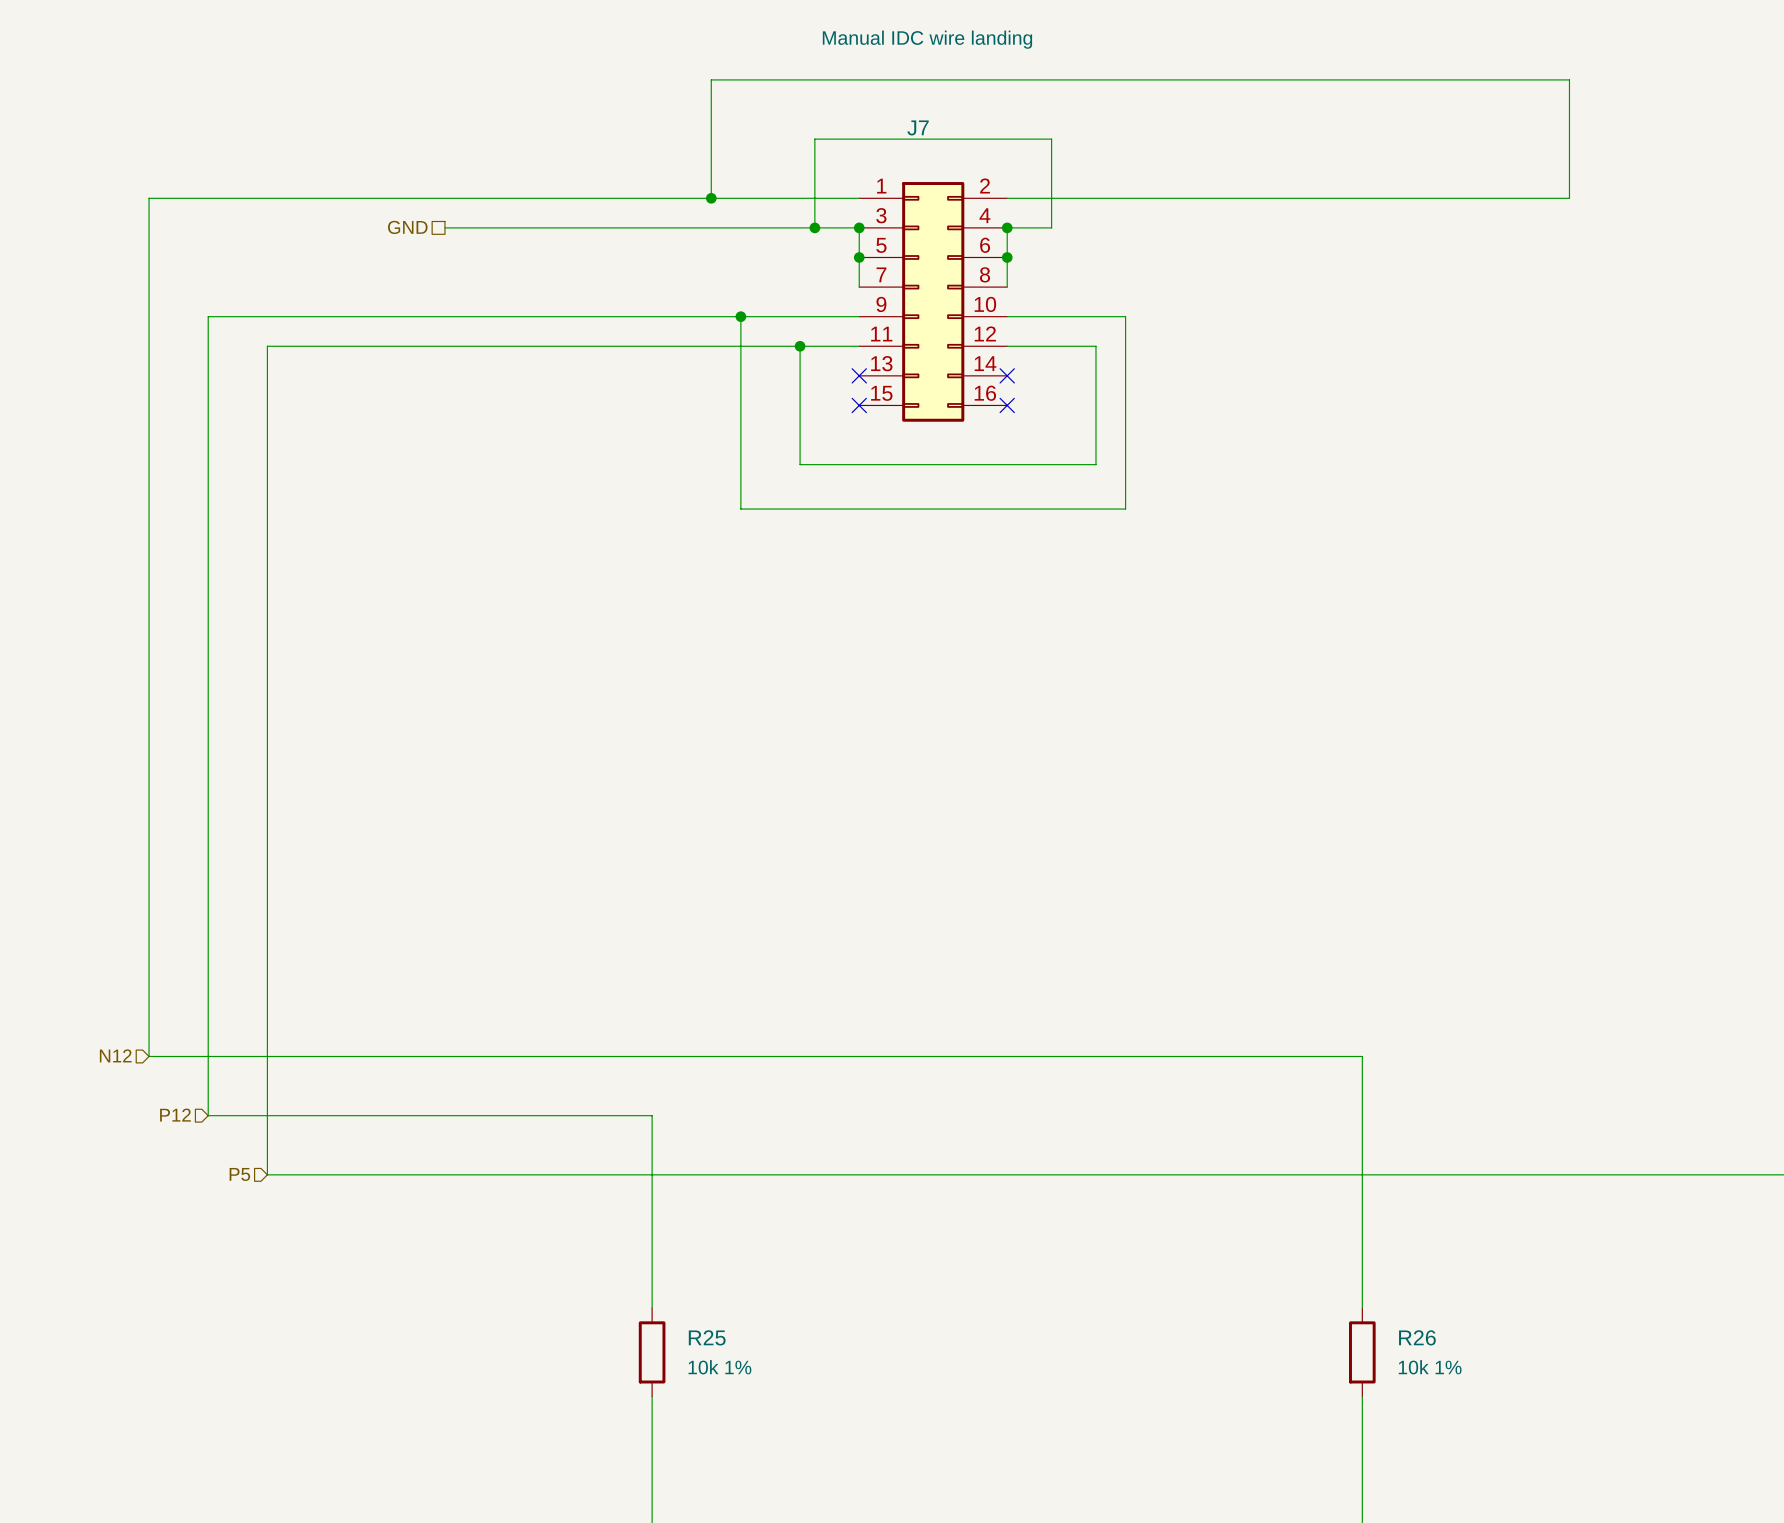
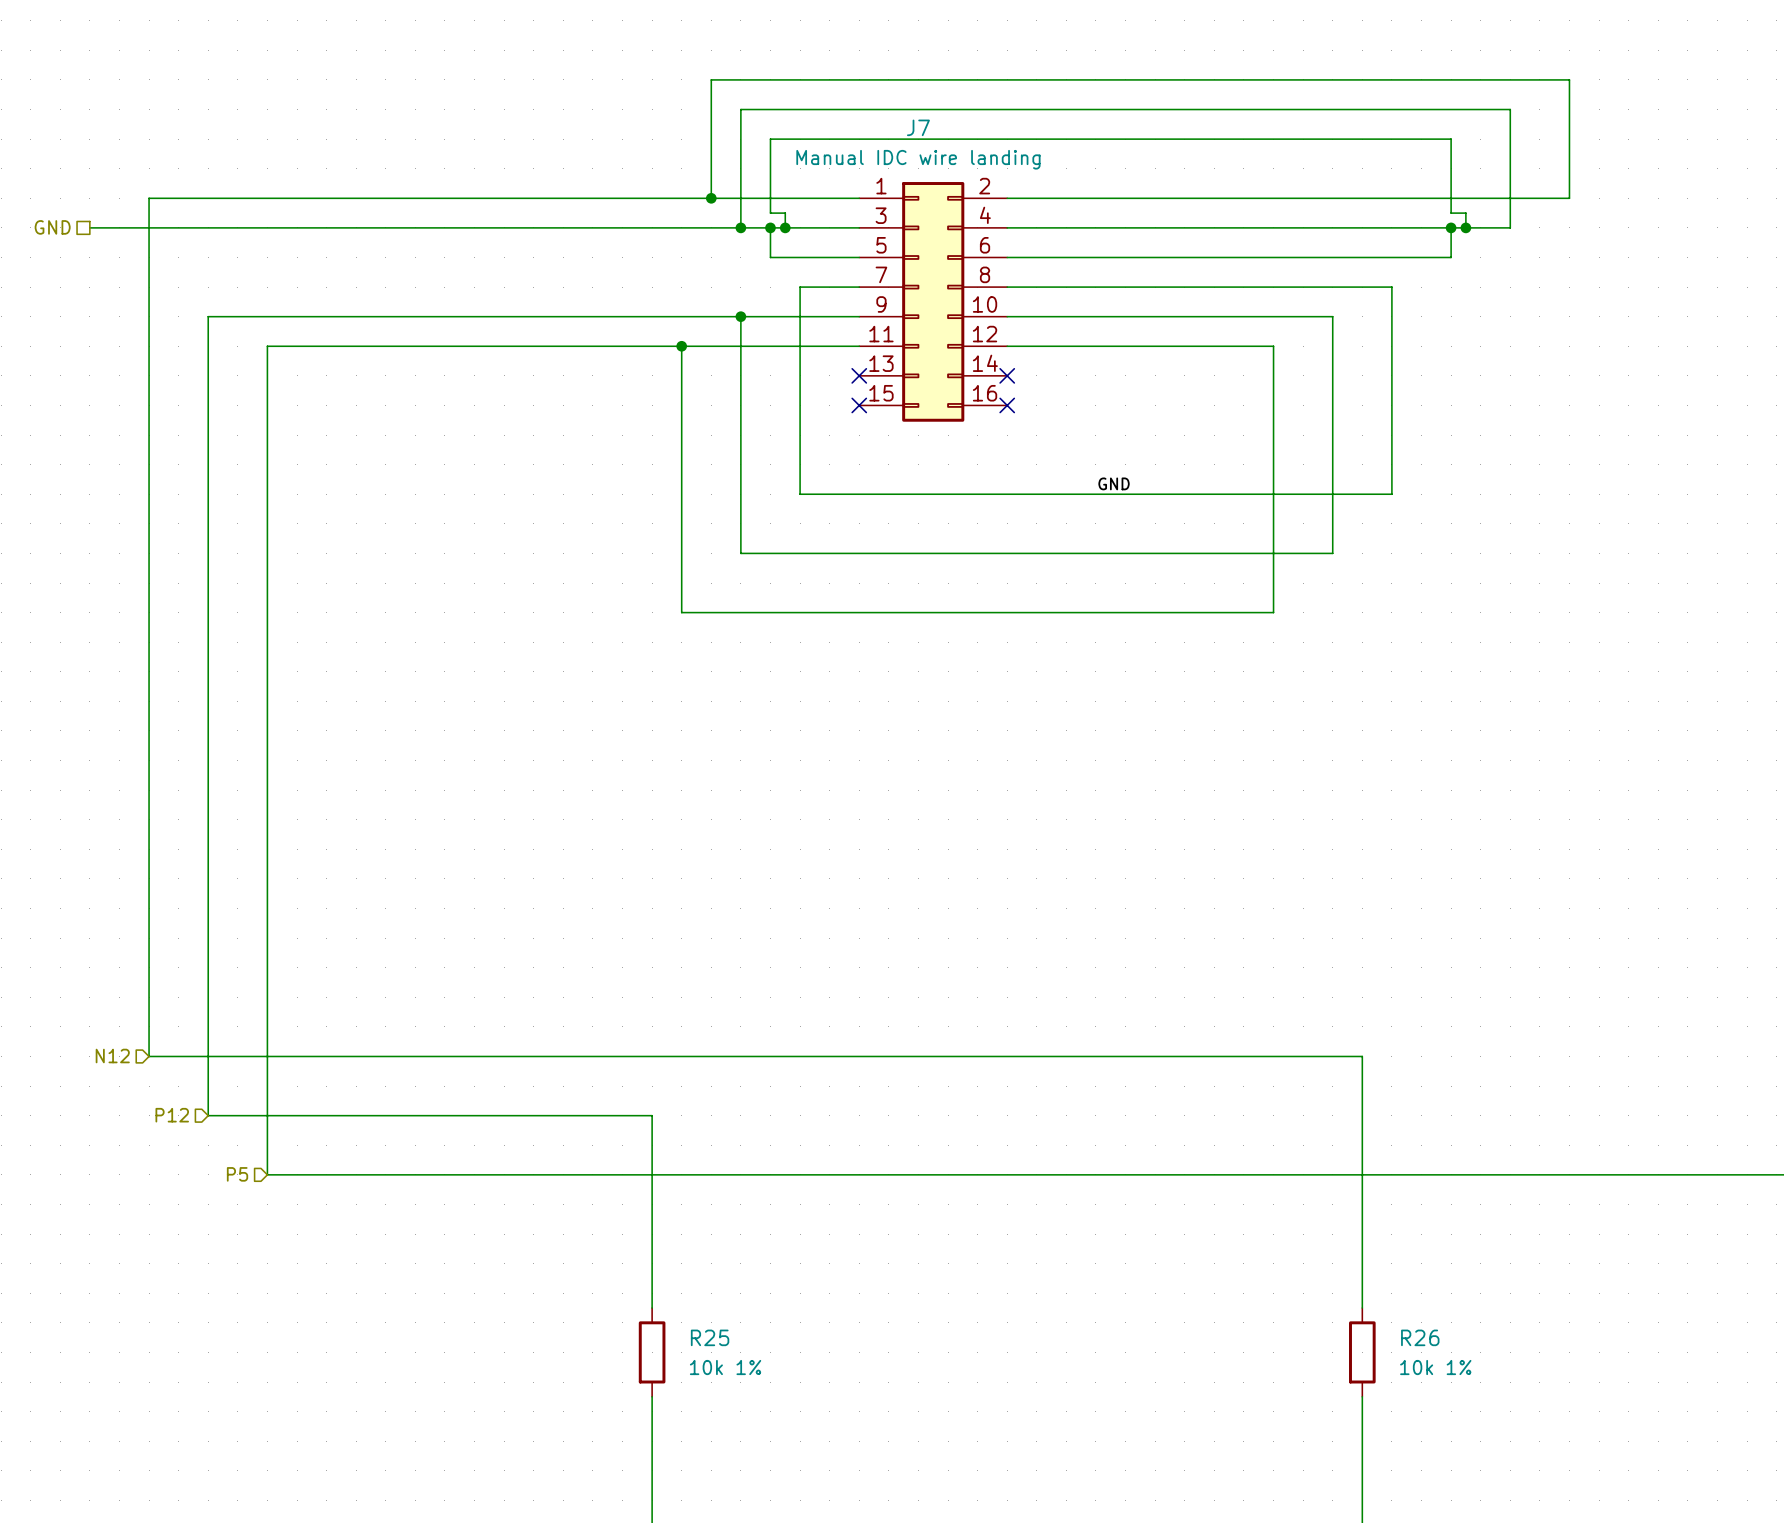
J7 value position: Manual IDC wire landing (927, 39) -> Manual IDC wire landing (918, 159)
wire: (814, 139) (814, 227) -> (814, 139) (770, 139) (770, 213) (785, 213) (785, 227)
wire: (1051, 139) (1051, 227) -> (740, 227) (740, 109) (1510, 109) (1510, 227) (1051, 227)
wire: none -> (1051, 139) (1451, 139) (1451, 213) (1465, 213) (1465, 227)
hierarchical label: none -> GND (52, 227)
wire: none -> (89, 227) (444, 227)
hierarchical label: GND (407, 227) -> none
junction: none -> (740, 227)
wire: none -> (770, 227) (770, 257) (859, 257)
junction: none -> (770, 227)
junction: none -> (785, 227)
junction: (814, 227) -> none
wire: (859, 227) (859, 287) -> (800, 346) (800, 287) (859, 287)
junction: (859, 227) -> none
wire: (1007, 227) (1007, 287) -> none
junction: (1007, 227) -> none
wire: none -> (1451, 227) (1451, 257) (1007, 257)
junction: none -> (1451, 227)
junction: none -> (1465, 227)
junction: (859, 257) -> none
junction: (1007, 257) -> none
wire: (1125, 316) (1125, 509) (740, 509) -> (1125, 316) (1332, 316) (1332, 553) (740, 553) (740, 509)
wire: none -> (681, 346) (681, 612) (1273, 612) (1273, 346) (1095, 346)
junction: none -> (681, 346)
junction: (800, 346) -> none
wire: (1095, 346) (1095, 464) (800, 464) -> (1007, 287) (1391, 287) (1391, 494) (800, 494) (800, 464)
label: none -> GND (1114, 483)

